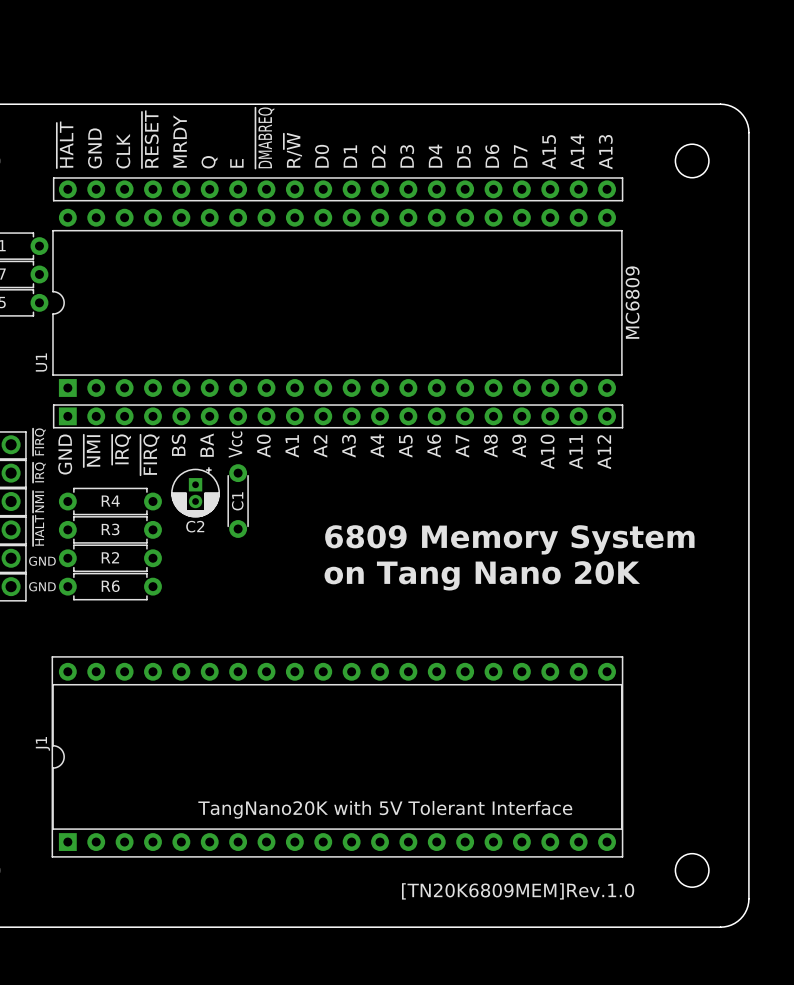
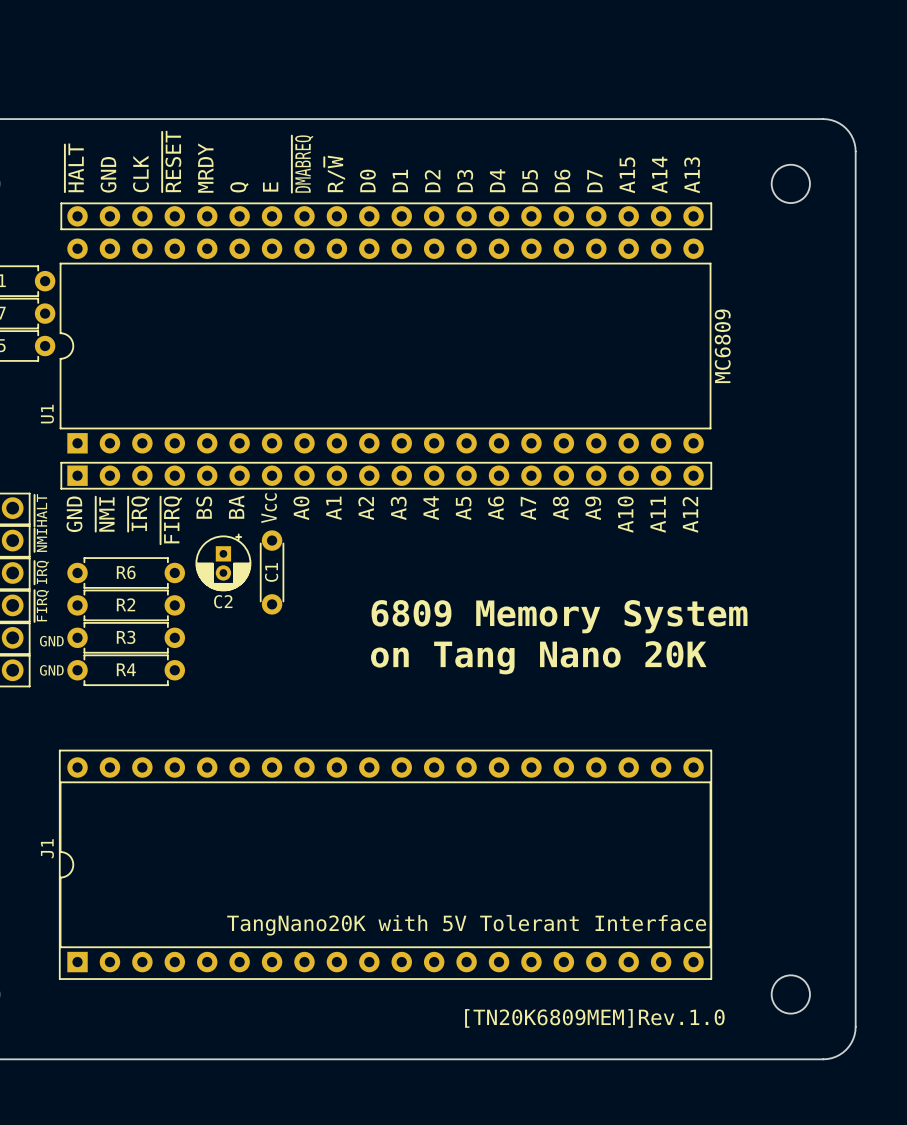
text position: ~{FIRQ} (39, 442) -> ~{FIRQ} (41, 605)
text: ~{IRQ} (39, 472) -> ~{NMI} (40, 540)
text: ~{NMI} (38, 501) -> ~{IRQ} (41, 572)
R4 name: R4 (110, 501) -> R6 (126, 572)
R3 name: R3 (110, 529) -> R2 (126, 604)
text position: ~{HALT} (38, 530) -> ~{HALT} (40, 510)
R2 name: R2 (110, 557) -> R3 (126, 637)
R6 name: R6 (110, 586) -> R4 (126, 669)

